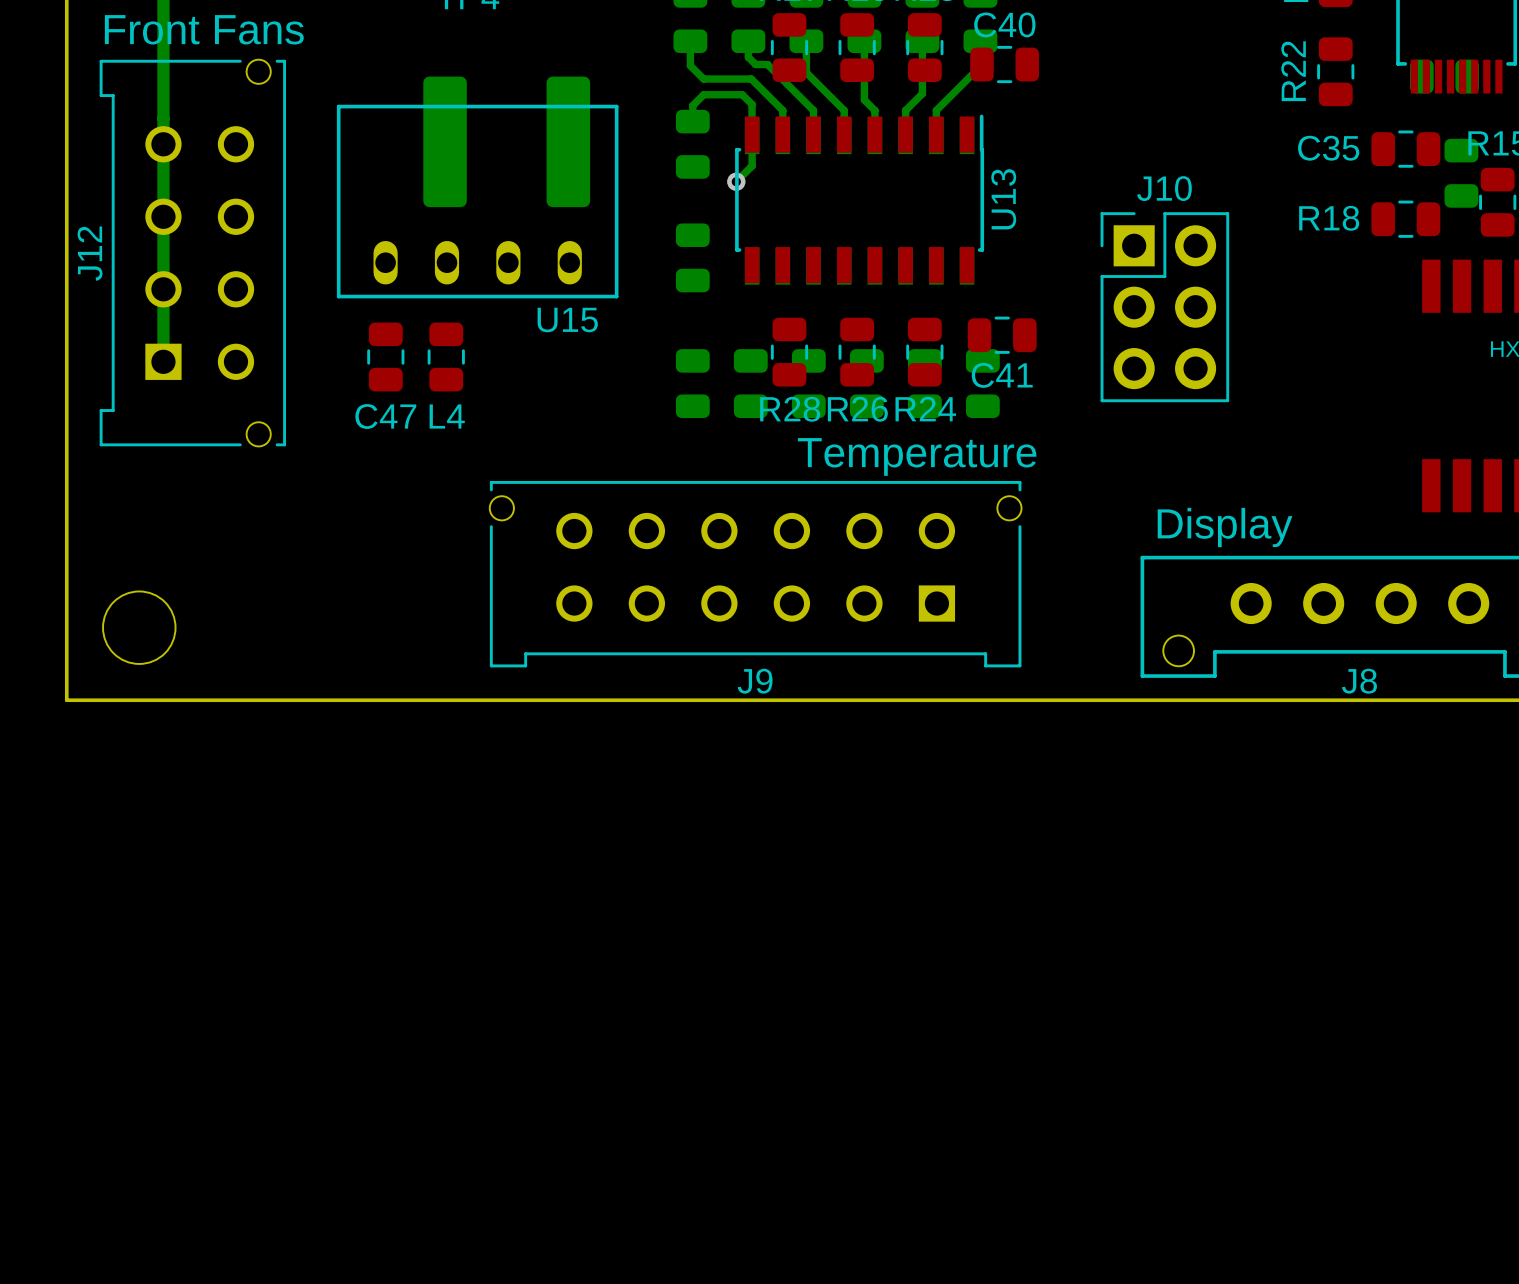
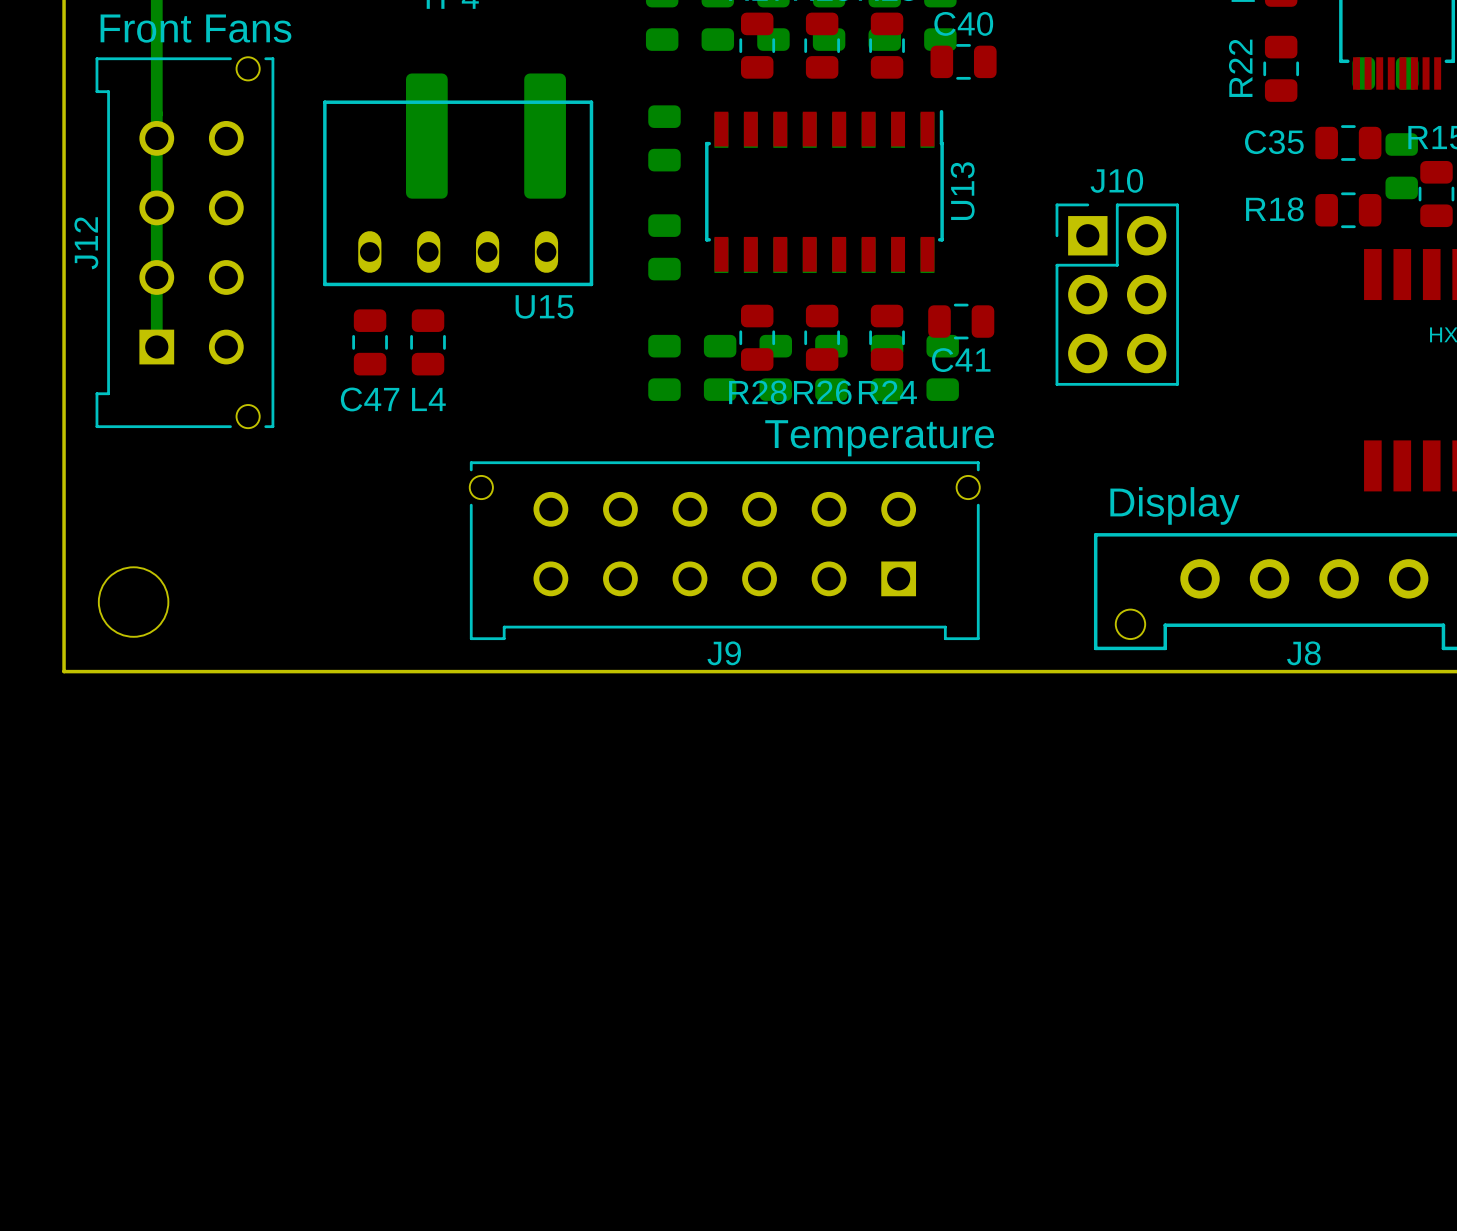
bottom track: (864, 40) (864, 99) (874, 110) (874, 136) -> none
bottom track: (690, 41) (690, 65) (703, 79) (751, 79) (782, 110) (782, 136) -> none
bottom track: (748, 41) (748, 57) (755, 64) (767, 64) (813, 110) (813, 136) -> none
bottom track: (806, 41) (806, 72) (844, 110) (844, 136) -> none
bottom track: (922, 41) (922, 93) (905, 110) (905, 136) -> none
bottom track: (980, 41) (980, 66) (936, 110) (936, 136) -> none
bottom track: (692, 121) (692, 105) (703, 94) (742, 94) (752, 104) (752, 165) (736, 181) -> none
via: (736, 181) -> none

